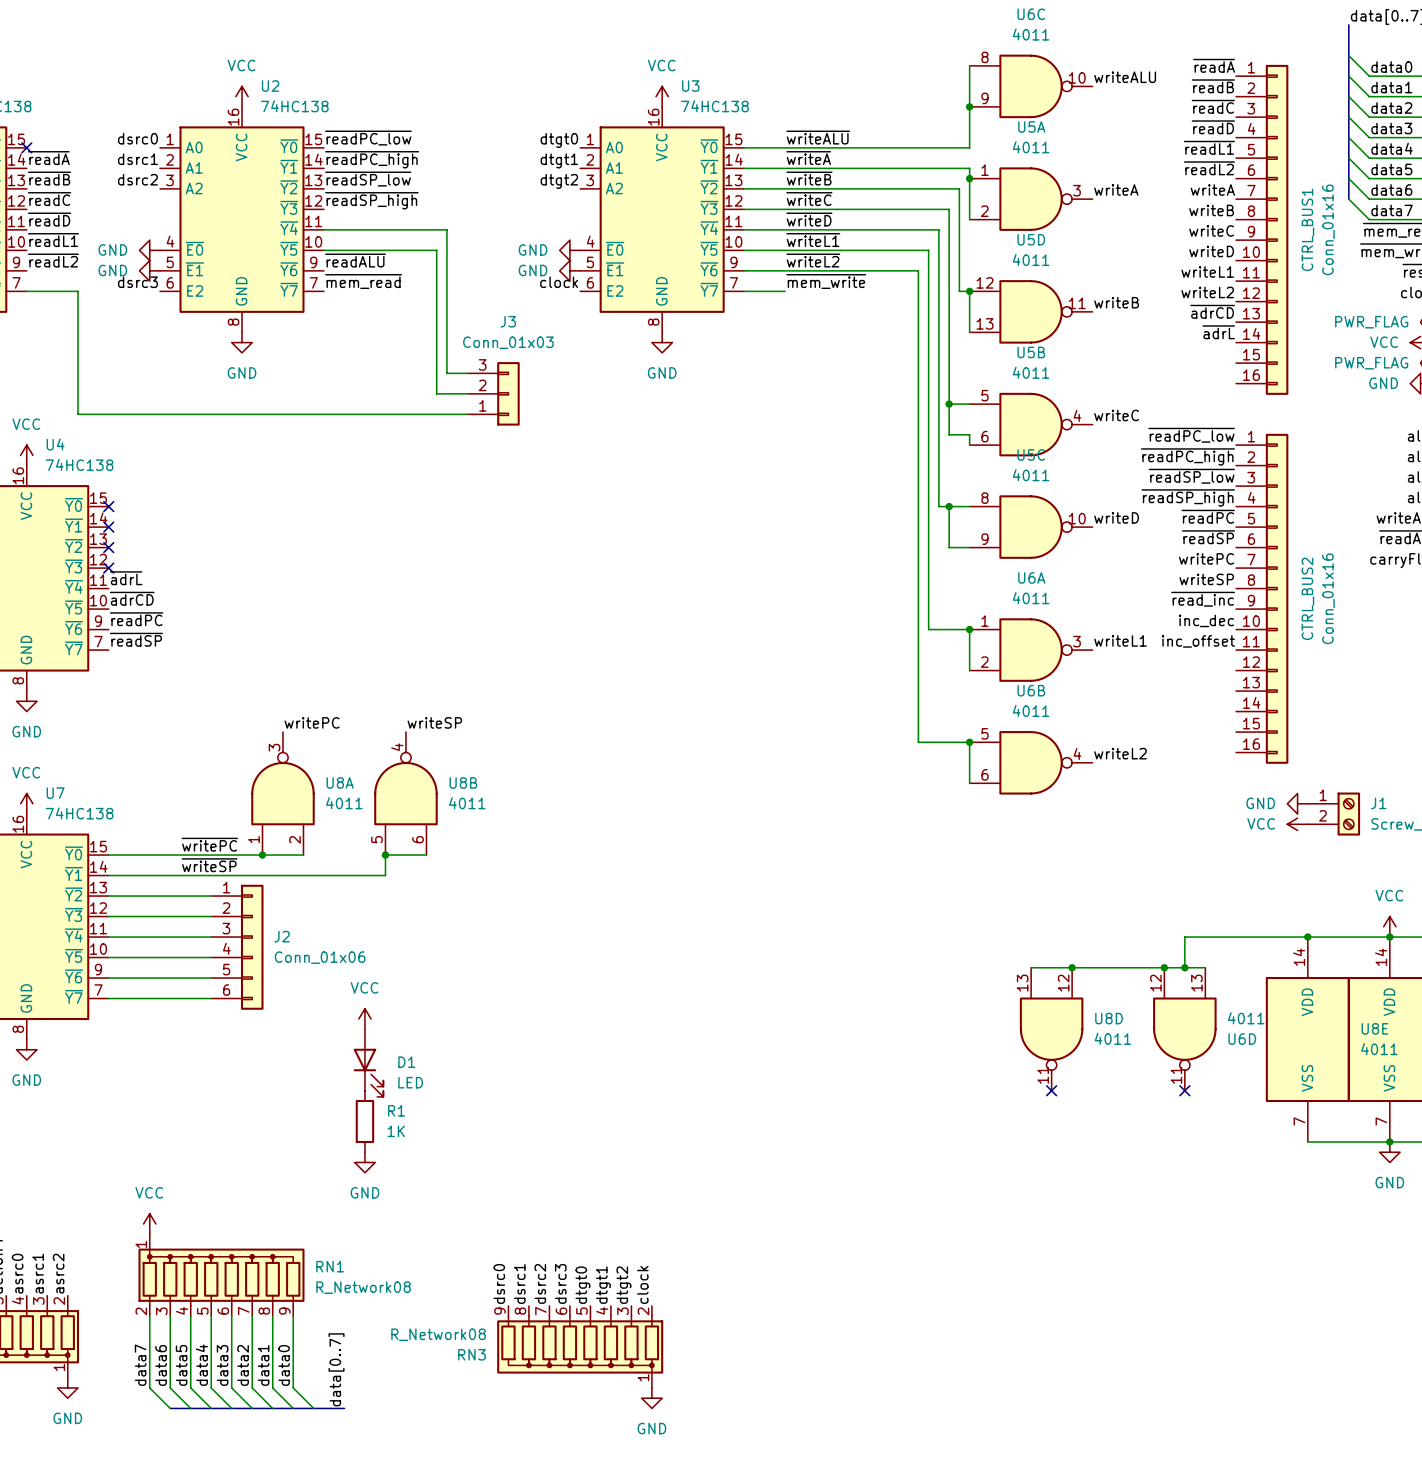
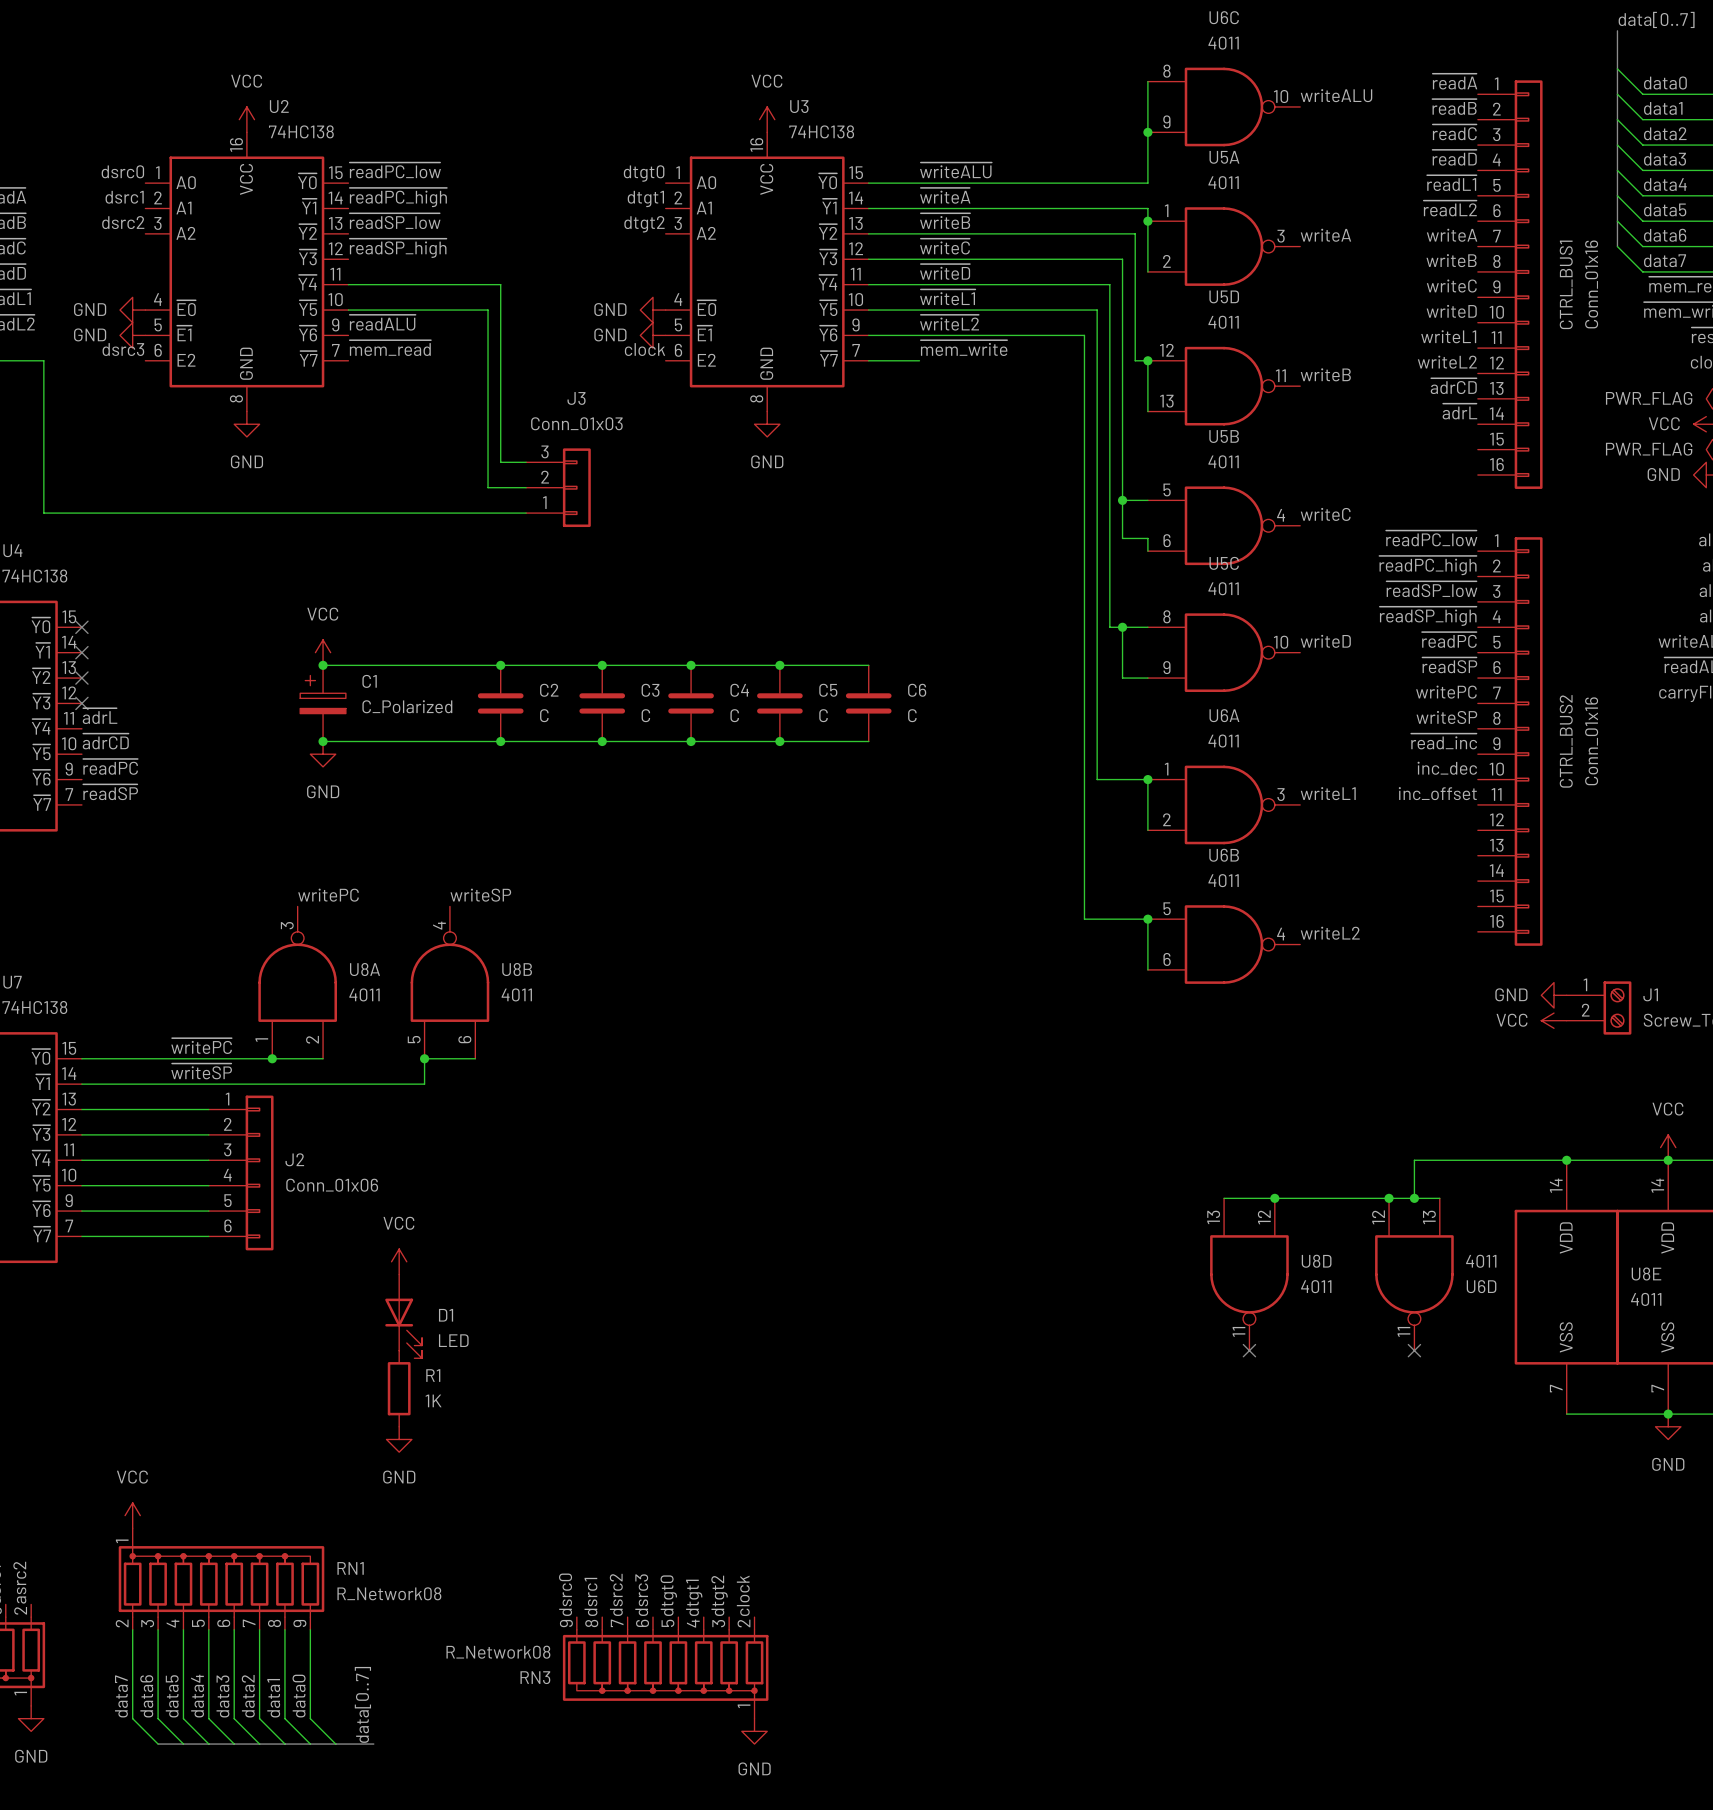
power symbol: none -> VCC (323, 652)
wire: none -> (323, 665) (868, 665)
junction: none -> (323, 665)
junction: none -> (500, 665)
junction: none -> (602, 665)
junction: none -> (691, 665)
junction: none -> (779, 665)
C1: none -> C_Polarized (323, 703)
C2: none -> C (500, 703)
C3: none -> C (602, 703)
C4: none -> C (691, 703)
C5: none -> C (779, 703)
C6: none -> C (868, 703)
wire: none -> (323, 741) (868, 741)
junction: none -> (323, 741)
junction: none -> (500, 741)
junction: none -> (602, 741)
junction: none -> (691, 741)
junction: none -> (779, 741)
power symbol: none -> GND (323, 754)

